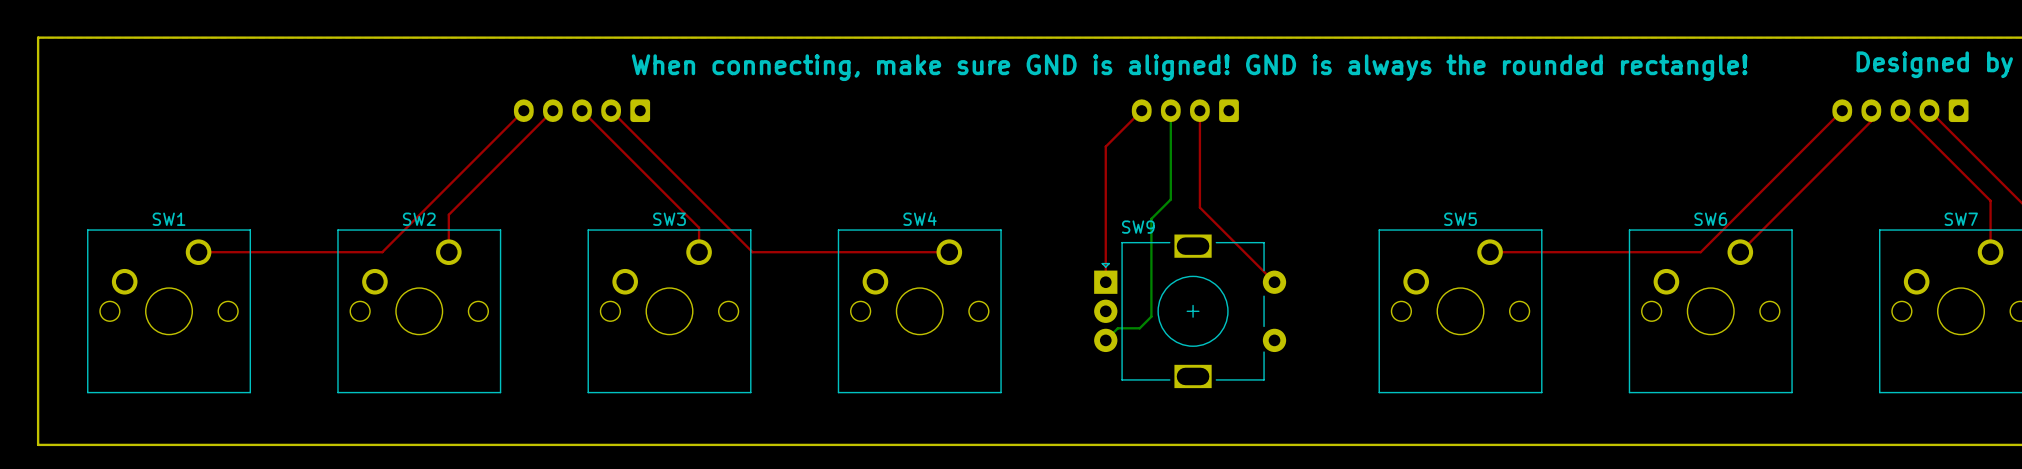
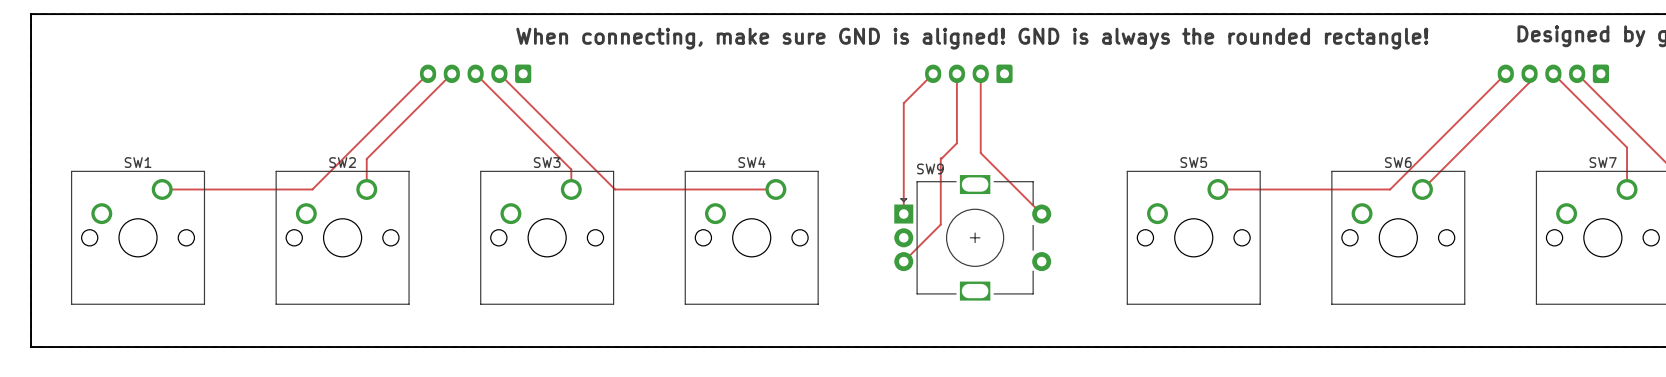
top track: none -> (956, 73) (956, 143) (940, 158) (940, 224) (903, 261)
bottom track: (1170, 110) (1170, 199) (1151, 218) (1151, 316) (1139, 328) (1117, 328) (1105, 340) -> none

